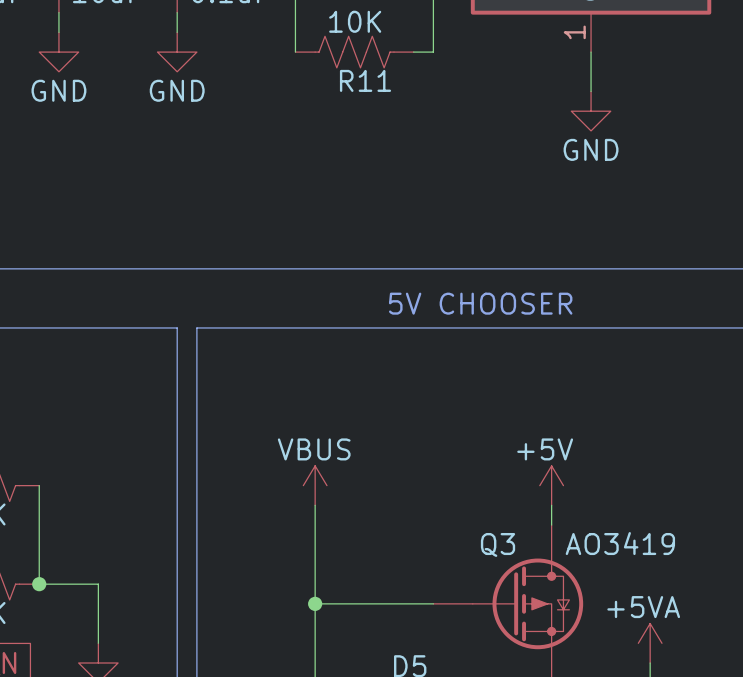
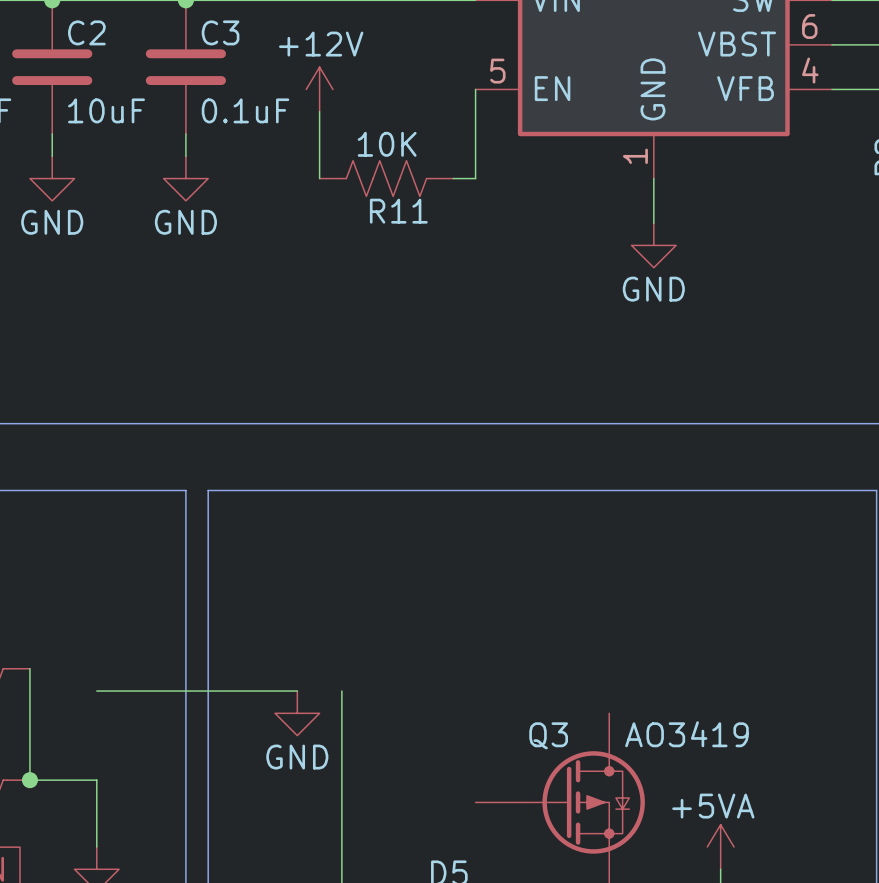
text: 5V CHOOSER (480, 303) -> none
power symbol: VBUS (315, 485) -> none
power symbol: +5V (551, 485) -> none
wire: none -> (96, 691) (297, 691)
wire: (551, 505) (551, 525) -> none
power symbol: none -> GND (297, 713)
wire: (315, 603) (433, 603) -> none
junction: (315, 603) -> none

